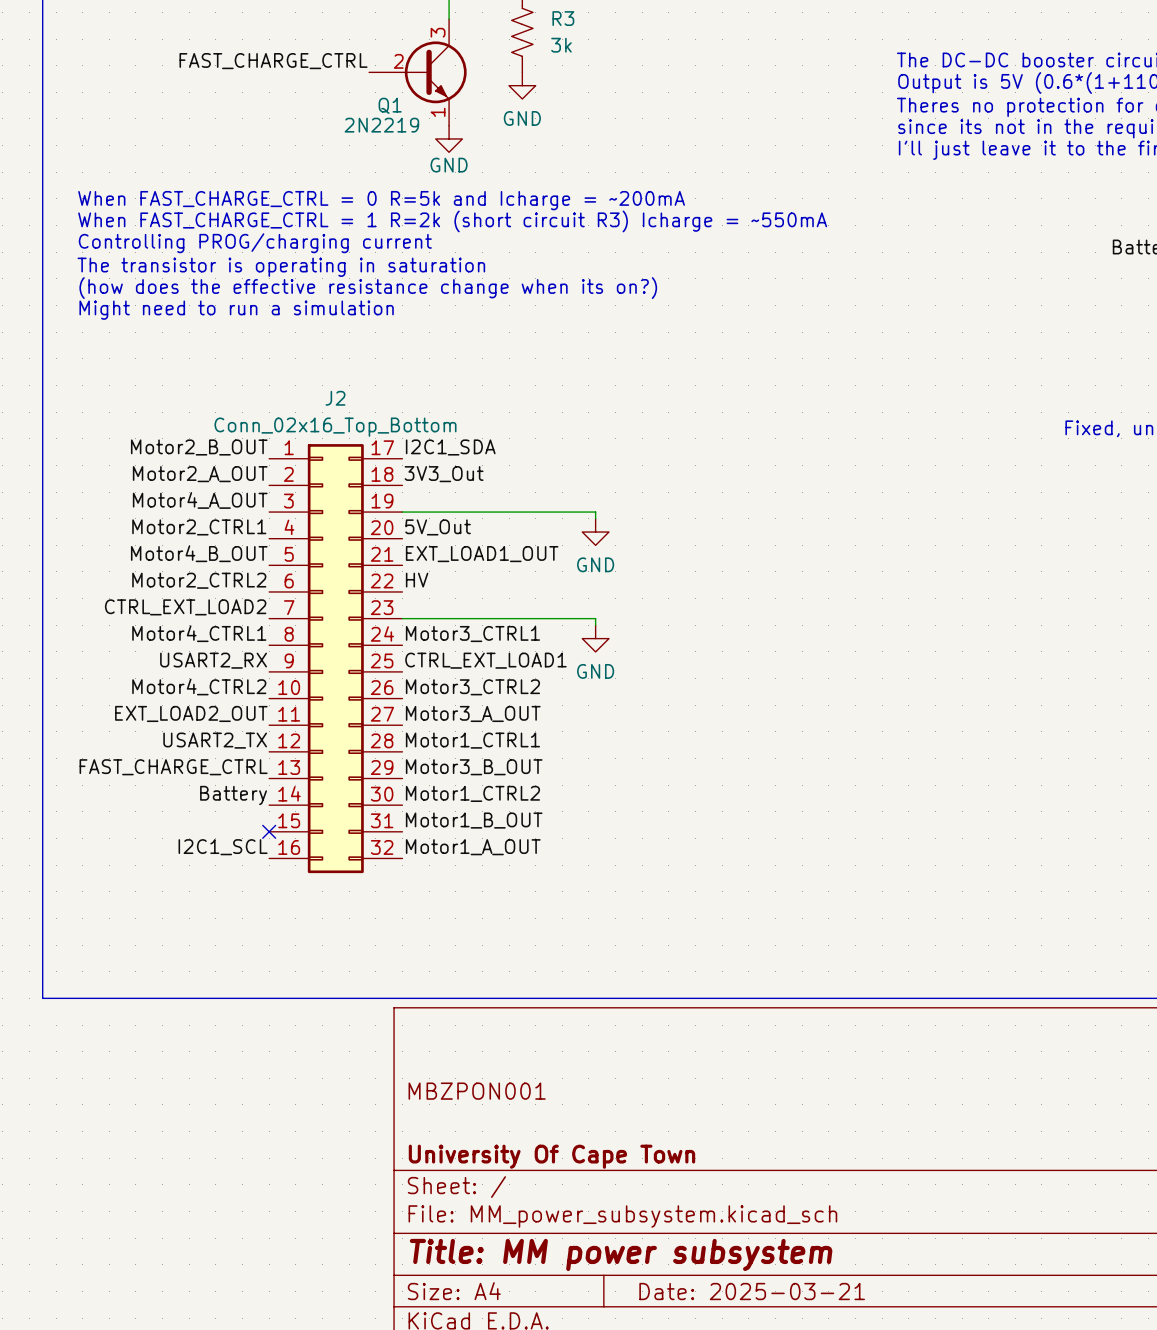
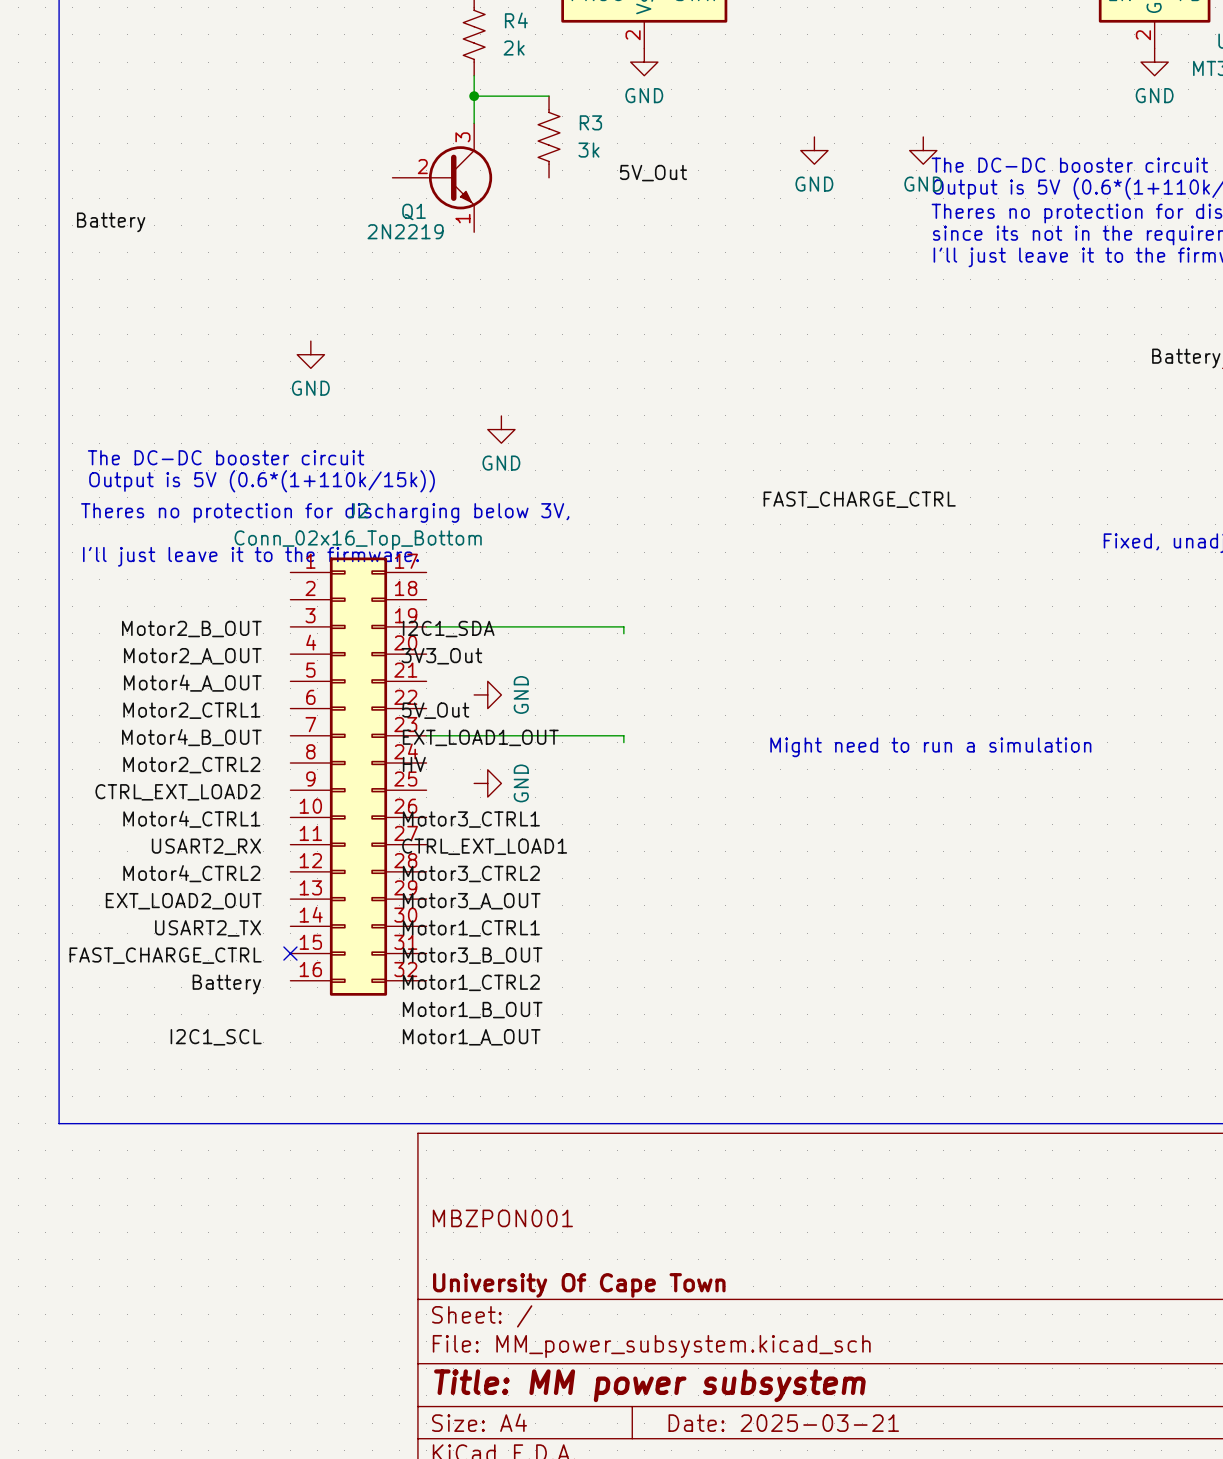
power symbol: none -> GND (814, 150)
power symbol: none -> GND (923, 150)
label: FAST_CHARGE_CTRL (273, 61) -> none
label: none -> 5V_Out (653, 173)
power symbol: GND (522, 85) -> none
label: none -> Battery (111, 222)
power symbol: GND (449, 138) -> none
text: When FAST_CHARGE_CTRL = 0 R=5k and Icharge = ~200mA (381, 200) -> none
text: When FAST_CHARGE_CTRL = 1 R=2k (short circuit R3) Icharge = ~550mA (452, 221) -> none
text: Controlling PROG/charging current (255, 243) -> none
power symbol: none -> GND (310, 354)
text: The transistor is operating in saturation (281, 267) -> none
text: (how does the effective resistance change when its on?) (368, 288) -> none
text: Might need to run a simulation (236, 310) -> none
power symbol: none -> GND (501, 429)
text: none -> The DC-DC booster circuit (226, 457)
text: none -> Output is 5V (0.6*(1+110k/15k)) (262, 481)
label: none -> FAST_CHARGE_CTRL (859, 499)
text: none -> Theres no protection for discharging below 3V, (325, 512)
text: none -> I'll just leave it to the firmware. (251, 556)
label position: Motor2_B_OUT (199, 447) -> Motor2_B_OUT (191, 629)
label position: I2C1_SDA (450, 447) -> I2C1_SDA (448, 629)
label position: Motor2_A_OUT (200, 474) -> Motor2_A_OUT (192, 656)
label position: 3V3_Out (444, 474) -> 3V3_Out (441, 656)
label position: Motor4_A_OUT (200, 500) -> Motor4_A_OUT (192, 683)
label position: Motor2_CTRL1 (199, 527) -> Motor2_CTRL1 (191, 710)
label position: 5V_Out (438, 527) -> 5V_Out (435, 710)
power symbol: GND (595, 532) -> none
label position: Motor4_B_OUT (199, 553) -> Motor4_B_OUT (191, 737)
label position: EXT_LOAD1_OUT (482, 554) -> EXT_LOAD1_OUT (480, 737)
power symbol: none -> GND (487, 694)
label position: Motor2_CTRL2 (199, 580) -> Motor2_CTRL2 (191, 765)
label position: HV (417, 580) -> HV (414, 764)
label position: CTRL_EXT_LOAD2 (185, 607) -> CTRL_EXT_LOAD2 (177, 792)
text: none -> Might need to run a simulation (930, 747)
label position: Motor4_CTRL1 (199, 633) -> Motor4_CTRL1 (191, 819)
label position: Motor3_CTRL1 (472, 634) -> Motor3_CTRL1 (471, 819)
power symbol: GND (595, 638) -> none
label position: USART2_RX (213, 660) -> USART2_RX (206, 846)
label position: CTRL_EXT_LOAD1 (485, 660) -> CTRL_EXT_LOAD1 (484, 846)
power symbol: none -> GND (487, 783)
label position: Motor4_CTRL2 (199, 687) -> Motor4_CTRL2 (191, 873)
label position: Motor3_CTRL2 (472, 687) -> Motor3_CTRL2 (471, 873)
label position: EXT_LOAD2_OUT (191, 713) -> EXT_LOAD2_OUT (183, 901)
label position: Motor3_A_OUT (473, 713) -> Motor3_A_OUT (471, 901)
label position: USART2_TX (215, 740) -> USART2_TX (208, 928)
label position: Motor1_CTRL1 (472, 740) -> Motor1_CTRL1 (471, 928)
label position: FAST_CHARGE_CTRL (173, 767) -> FAST_CHARGE_CTRL (165, 955)
label position: Motor3_B_OUT (474, 767) -> Motor3_B_OUT (472, 955)
label position: Motor1_CTRL2 (472, 793) -> Motor1_CTRL2 (471, 982)
label position: Battery (233, 795) -> Battery (226, 984)
label position: Motor1_B_OUT (474, 820) -> Motor1_B_OUT (472, 1010)
label position: I2C1_SCL (223, 847) -> I2C1_SCL (216, 1037)
label position: Motor1_A_OUT (473, 847) -> Motor1_A_OUT (471, 1037)

